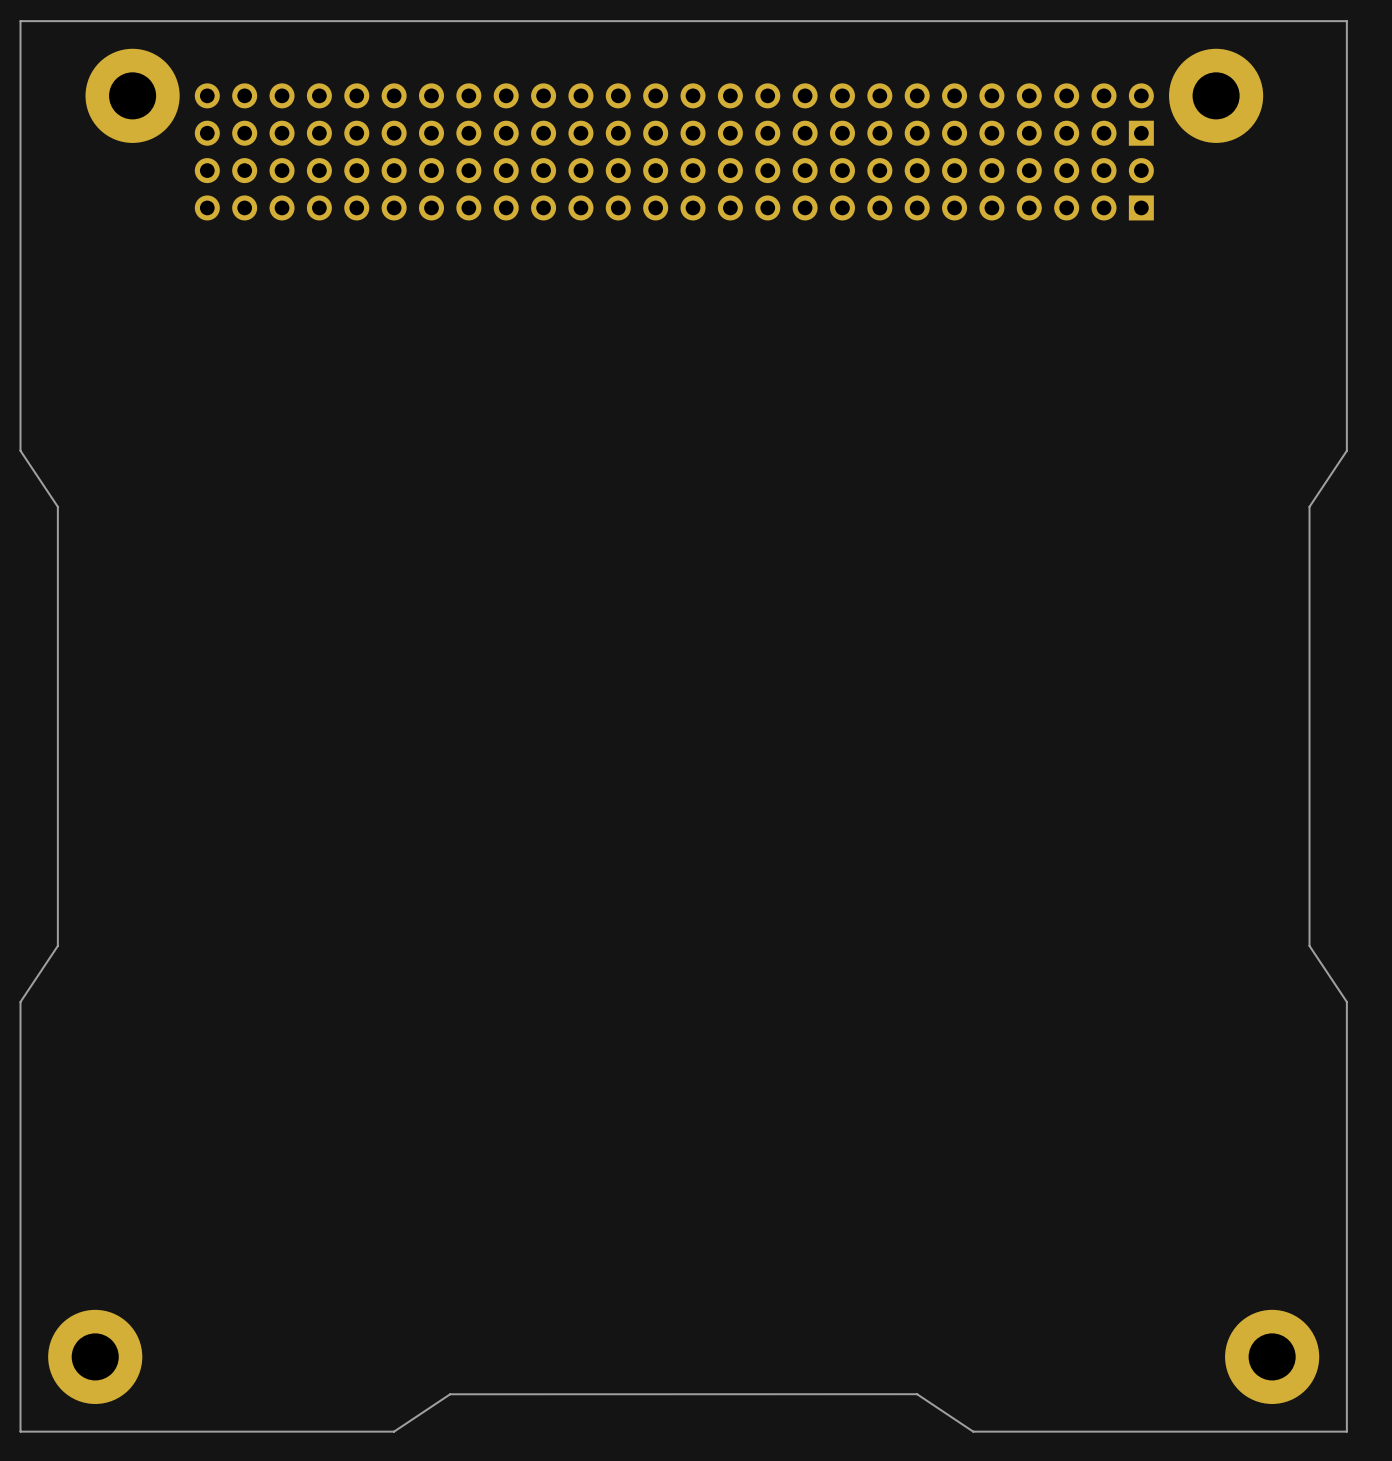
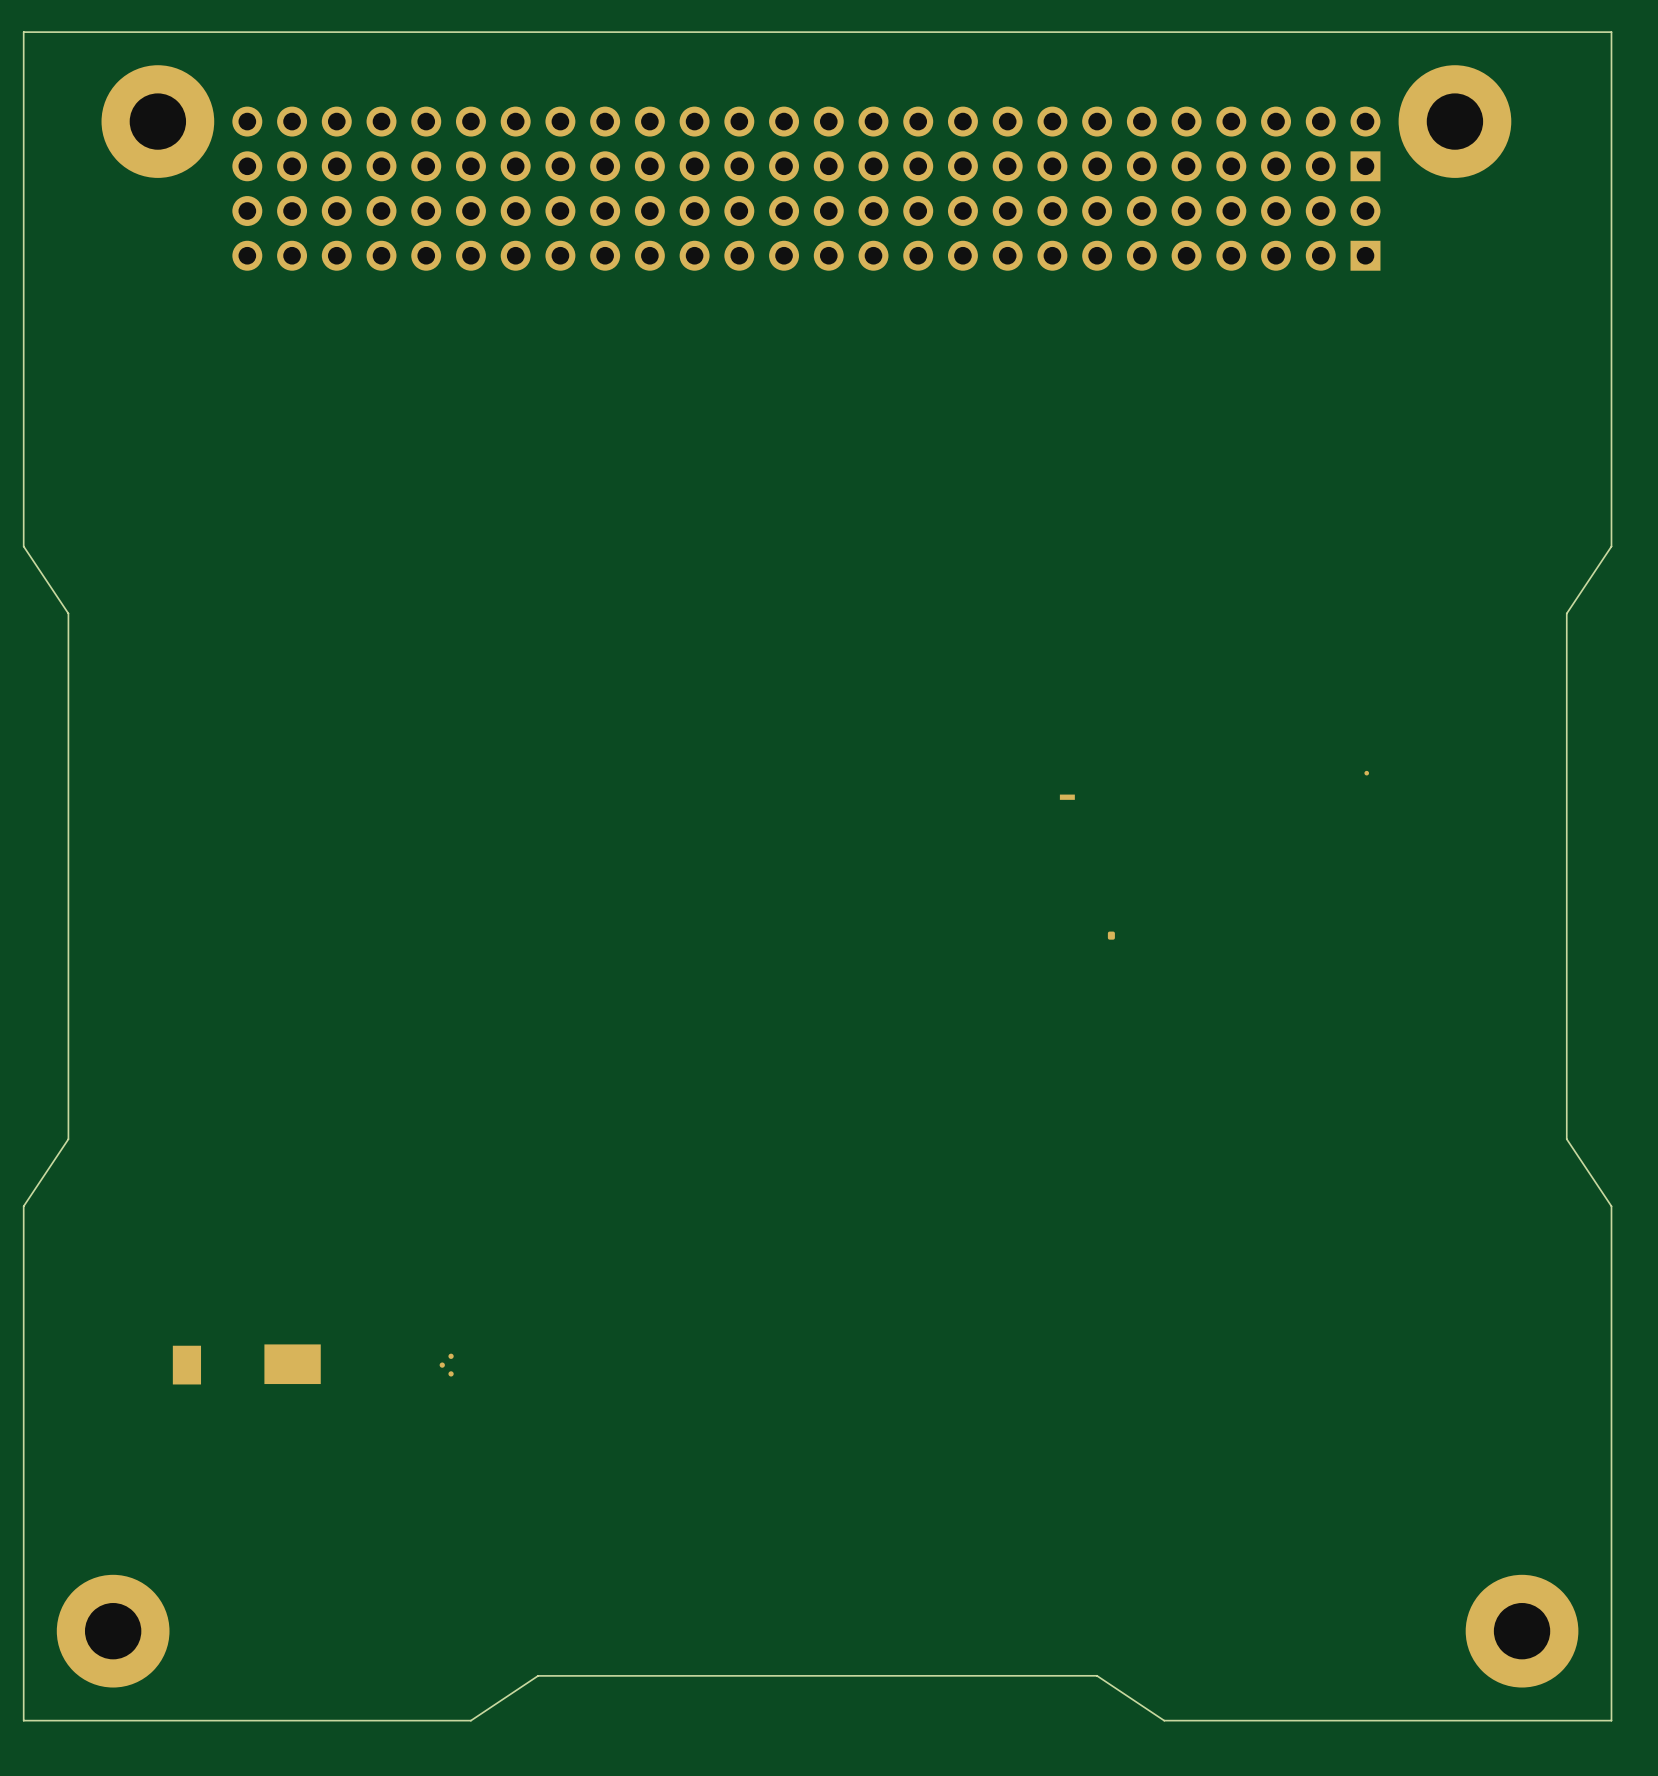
part: none -> (1366, 773)
part: none -> (1067, 797)
part: none -> (1111, 935)
part: none -> (292, 1364)
part: none -> (186, 1365)
part: none -> (446, 1365)

